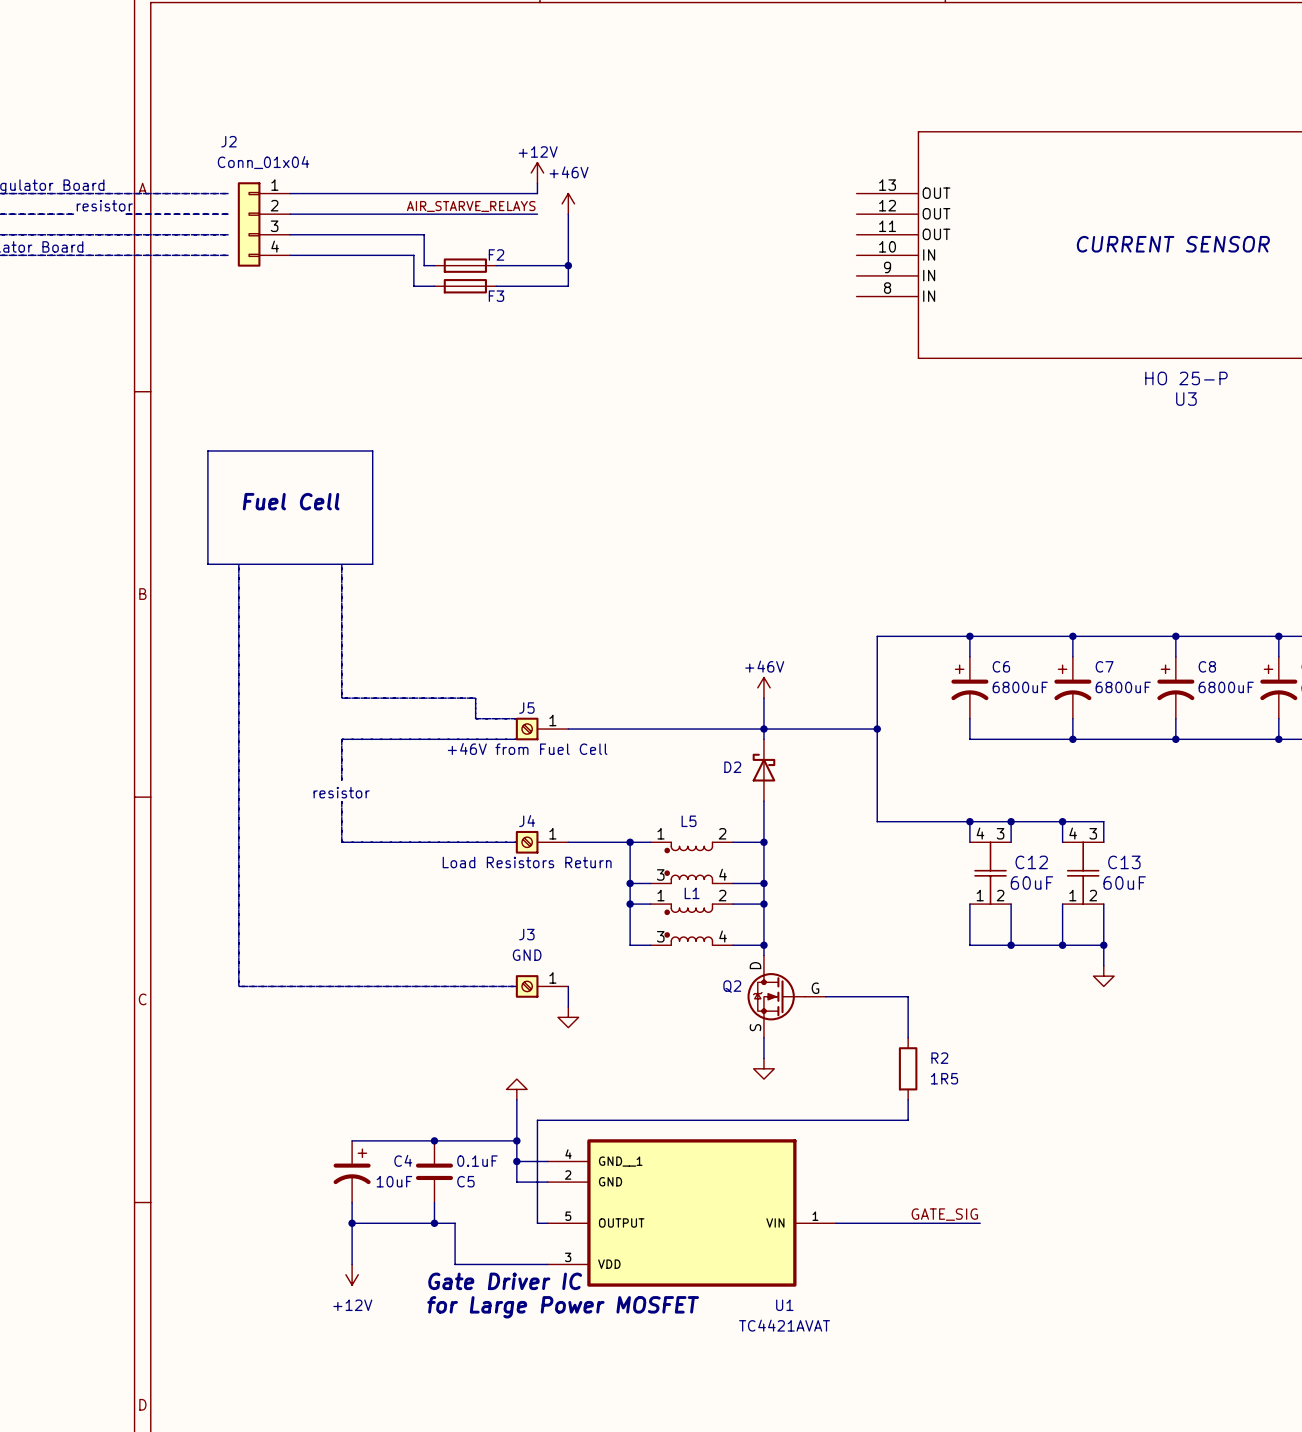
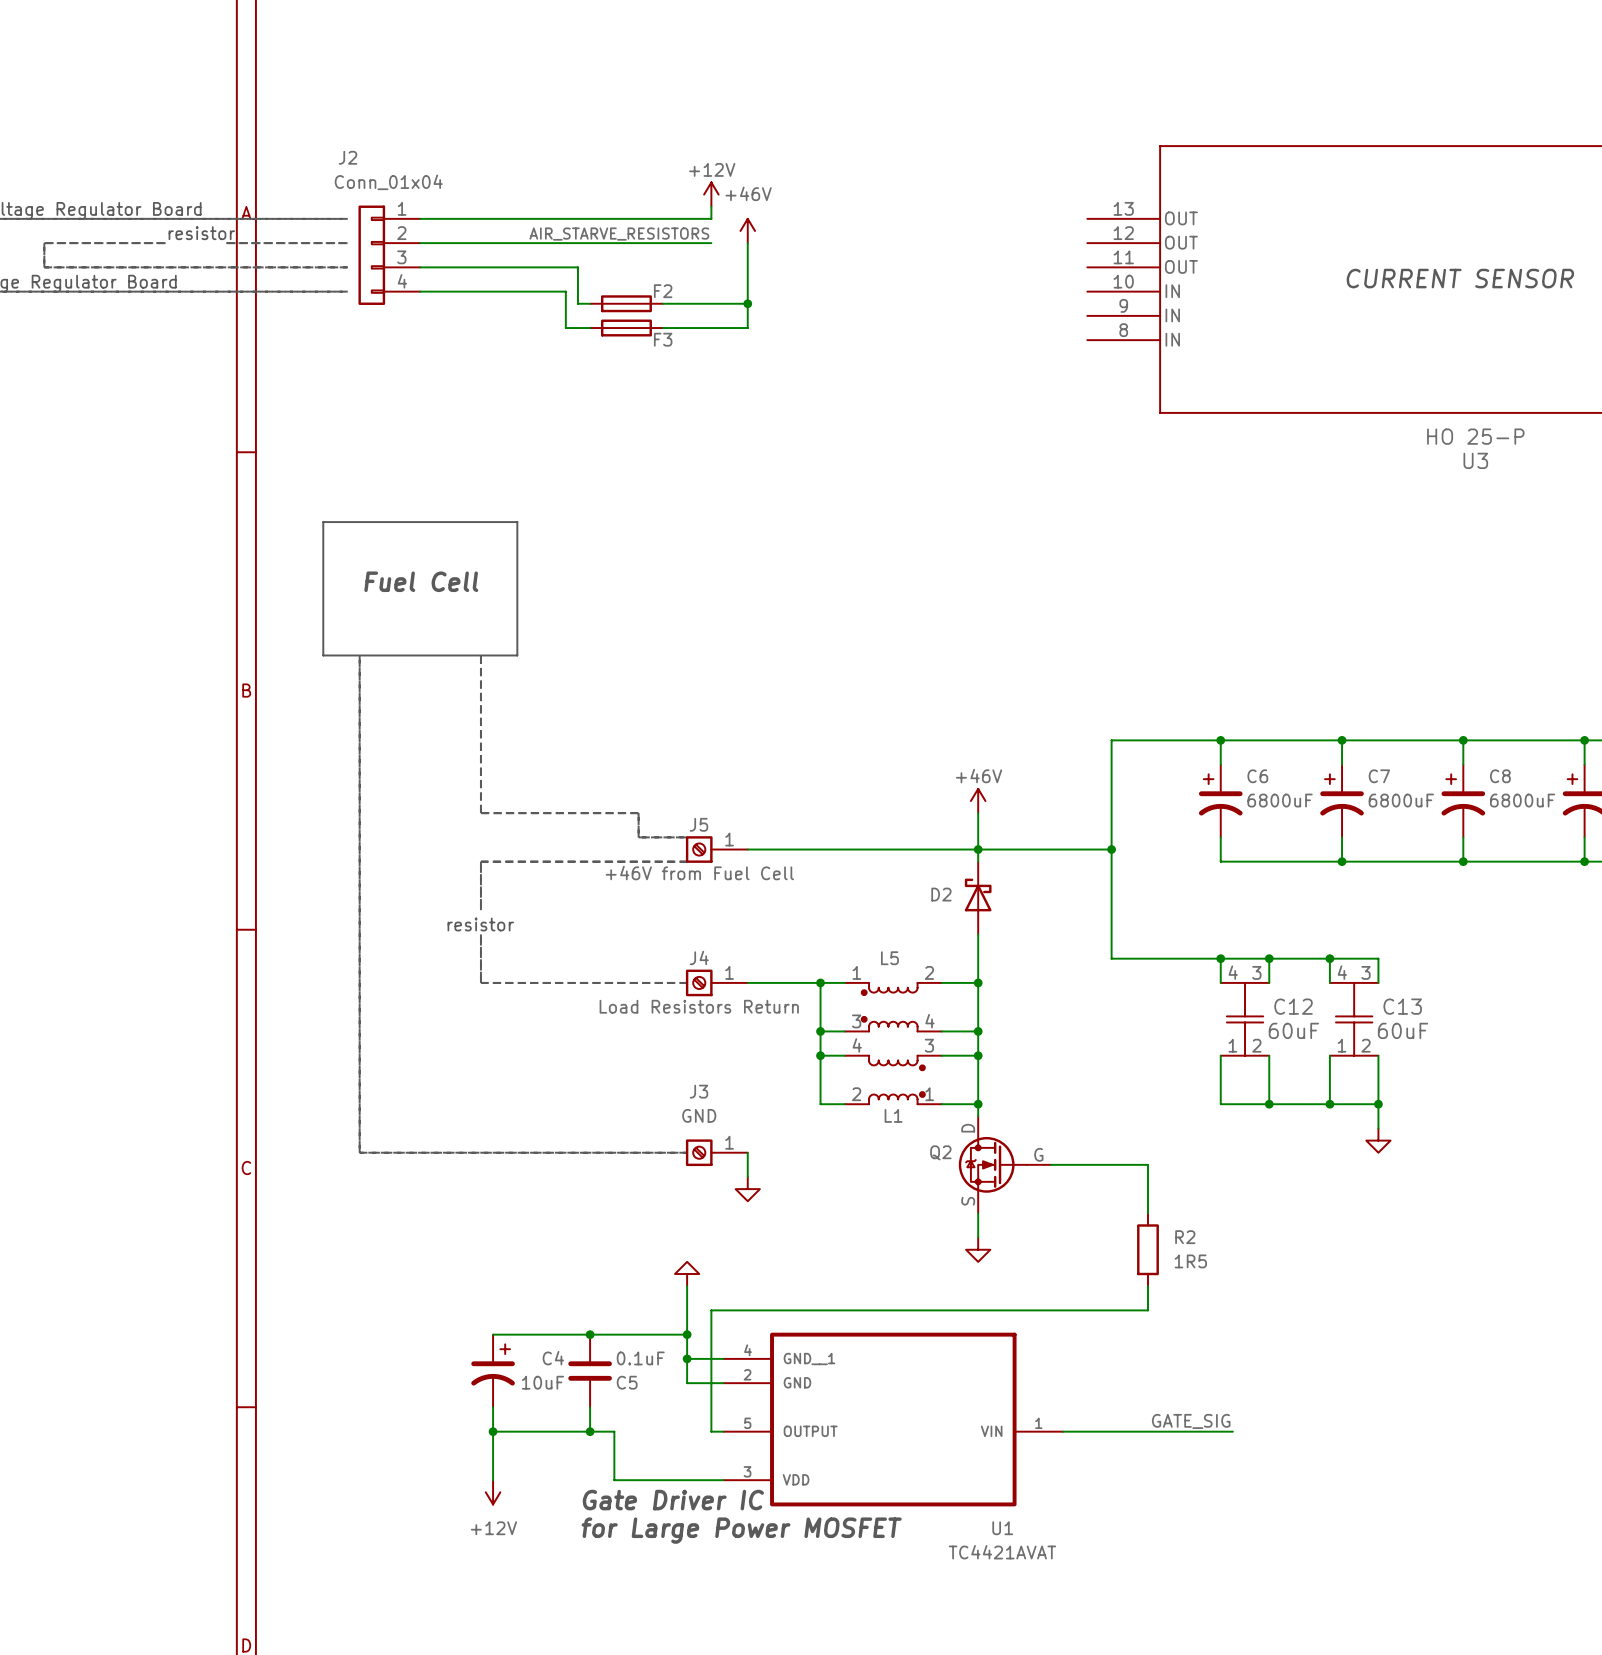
label: AIR_STARVE_RELAYS (471, 206) -> AIR_STARVE_RESISTORS (619, 234)
L1 rotation: 0° (688, 924) -> 180° (896, 1079)

